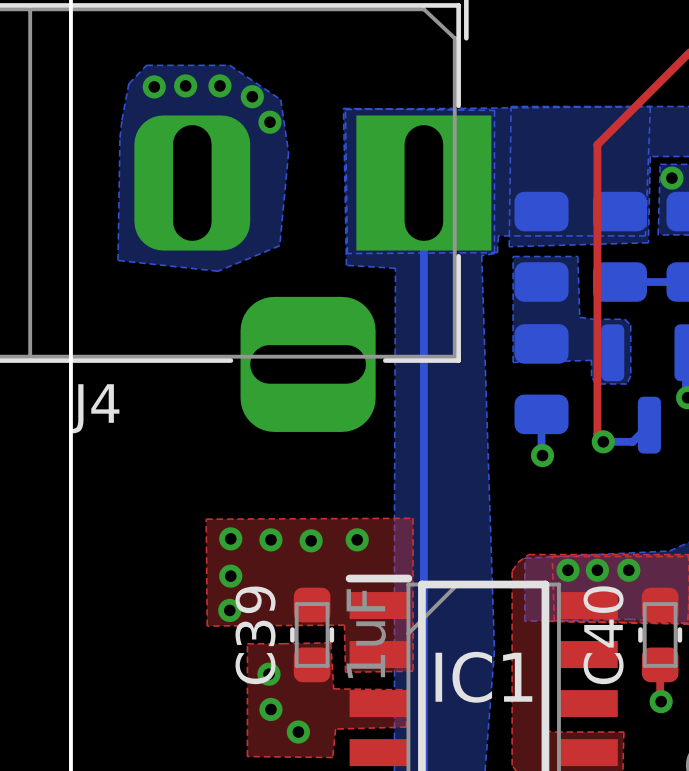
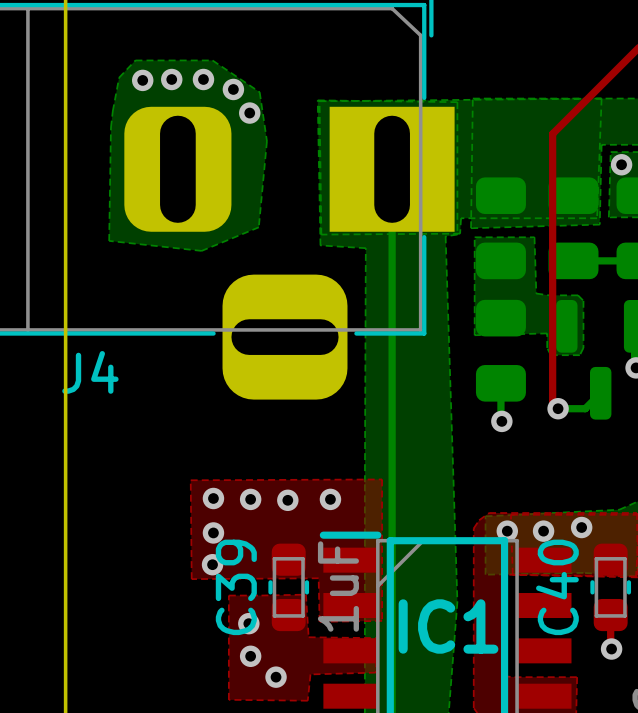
via: (568, 570) -> none
via: (597, 570) -> none
via: none -> (507, 531)
via: none -> (543, 531)

